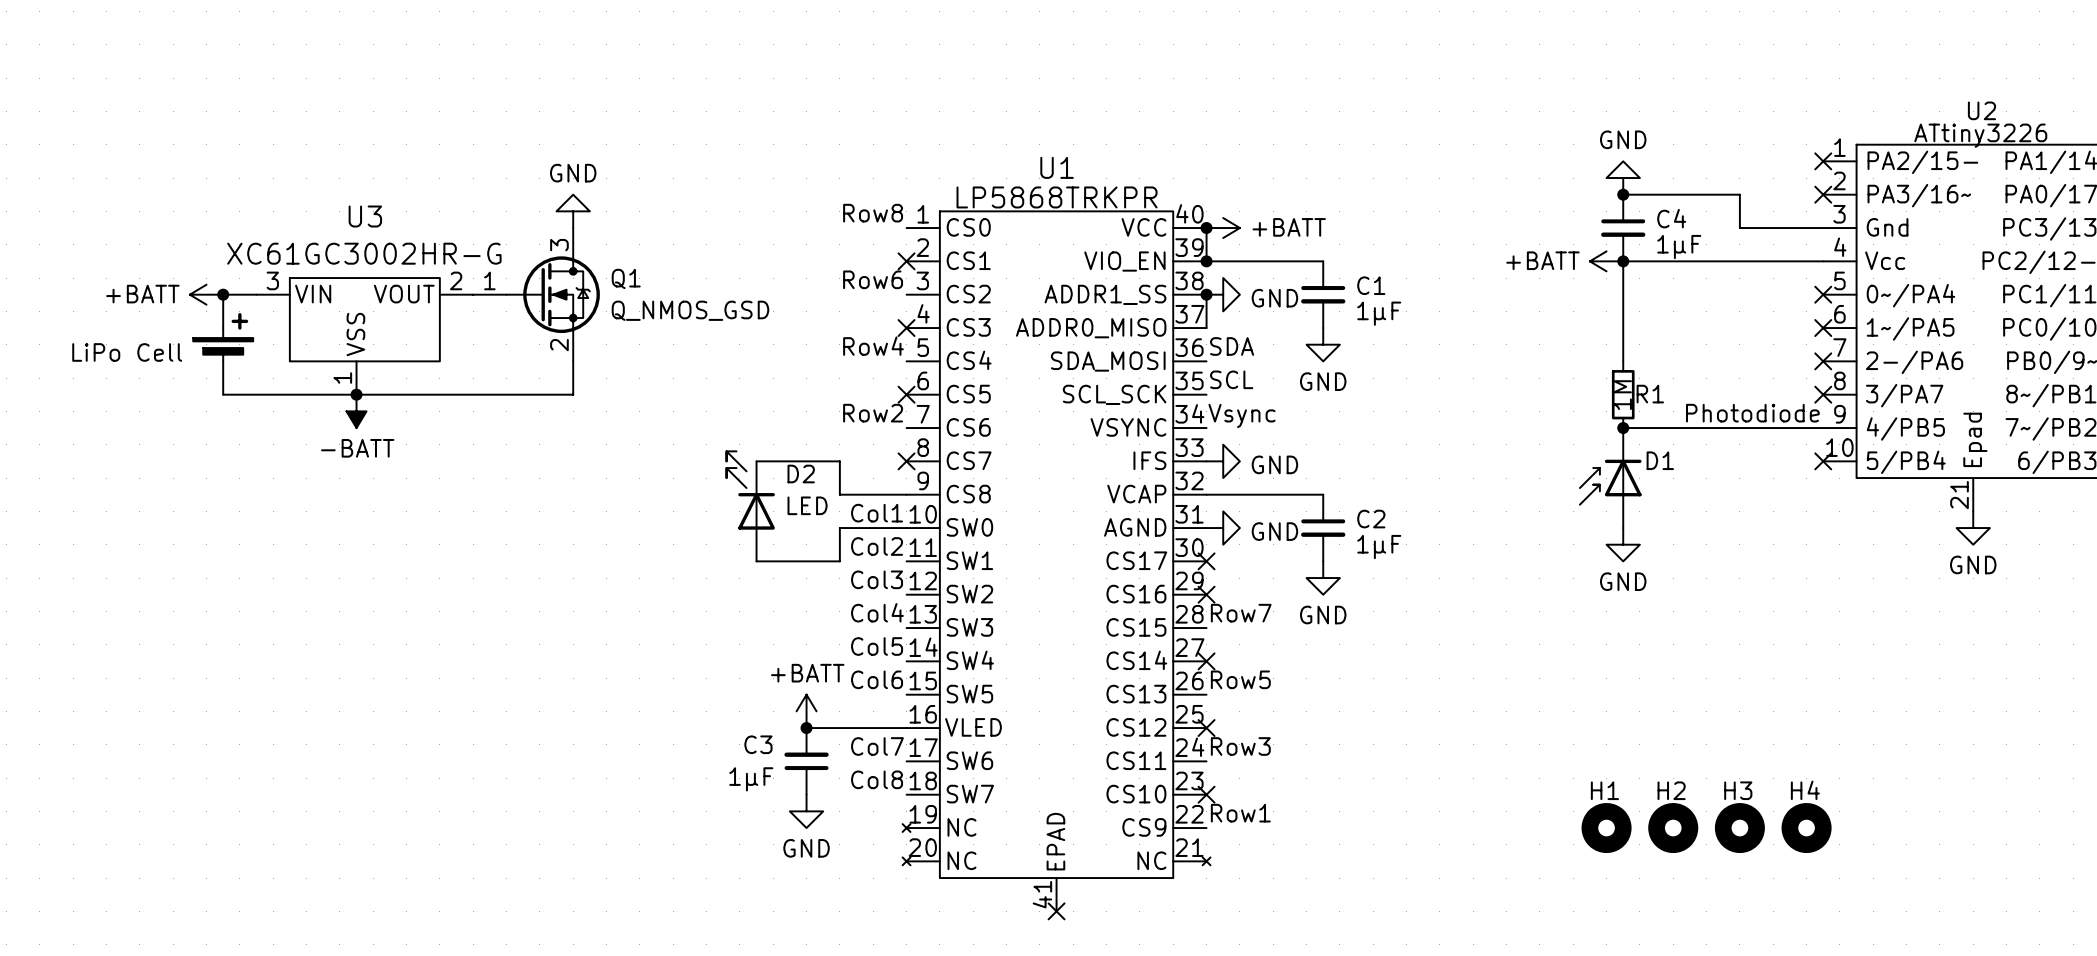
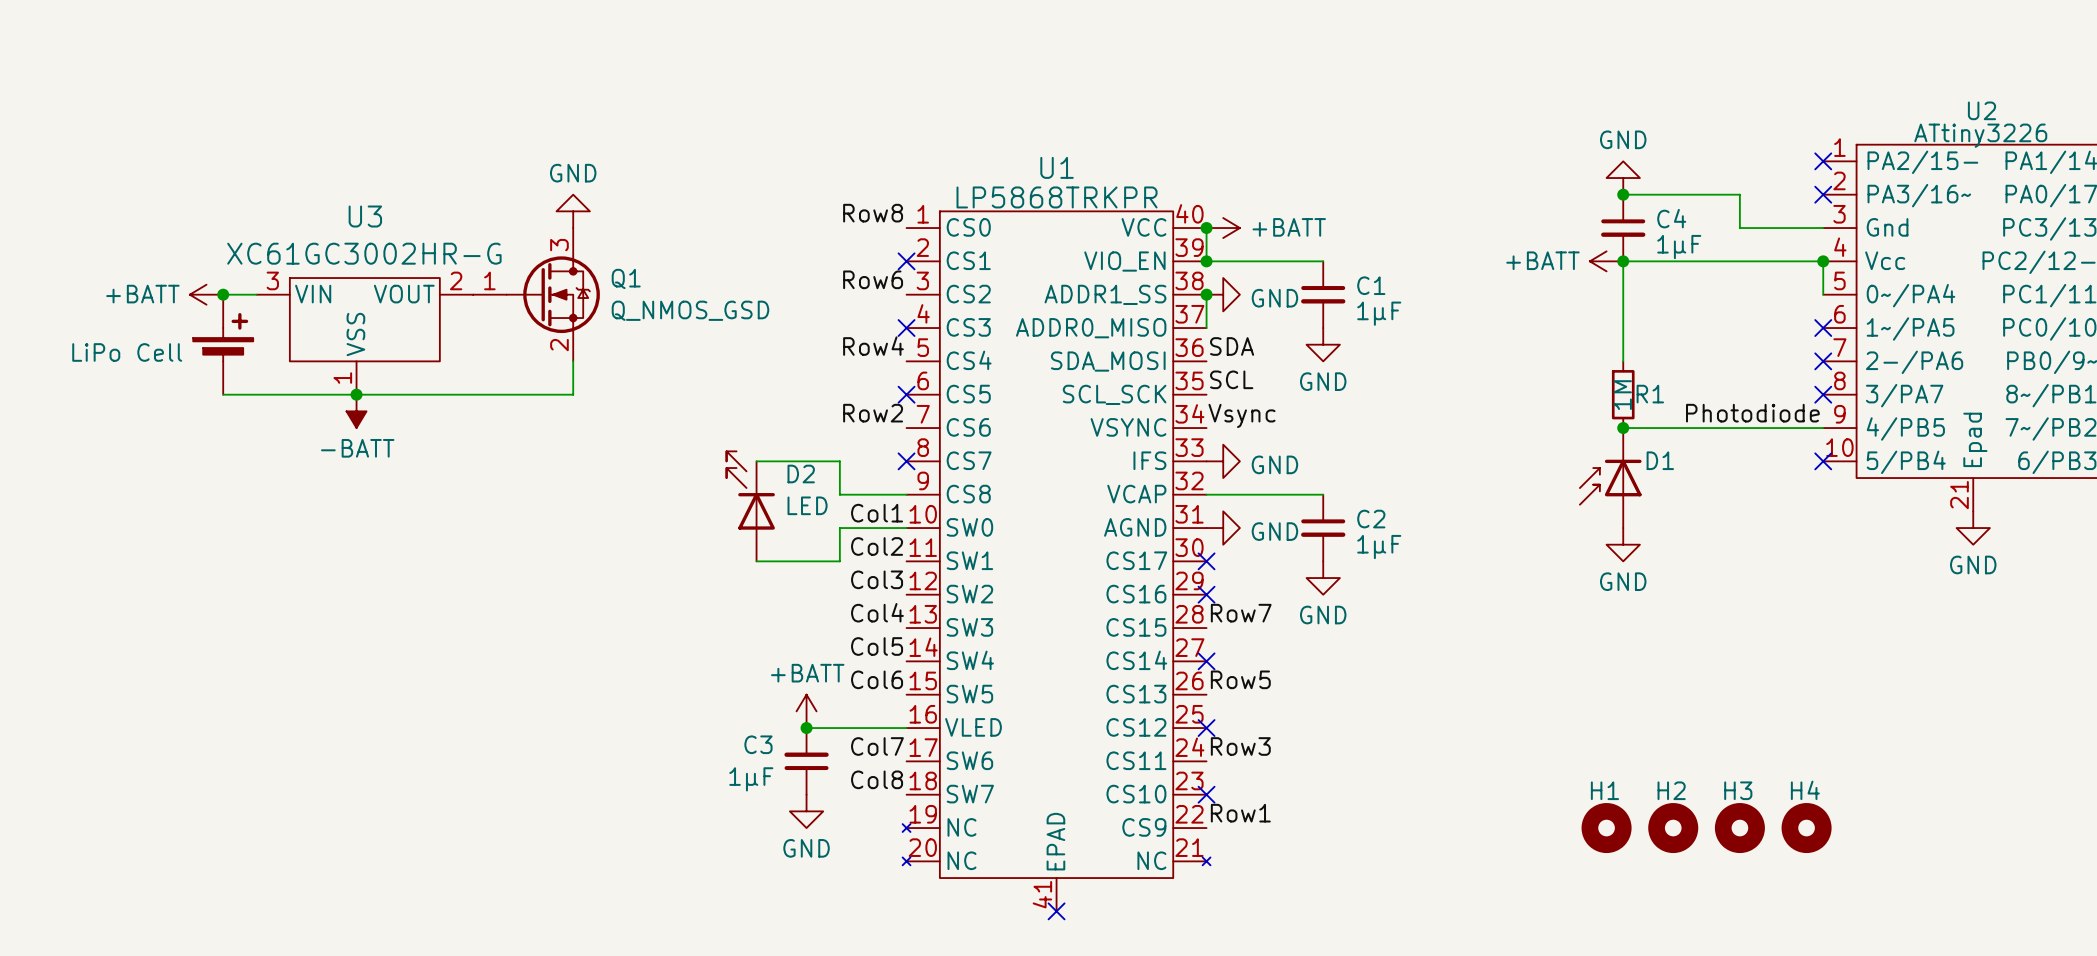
wire: none -> (1823, 261) (1823, 294)
junction: none -> (1823, 261)
no-connect mark: (1823, 294) -> none

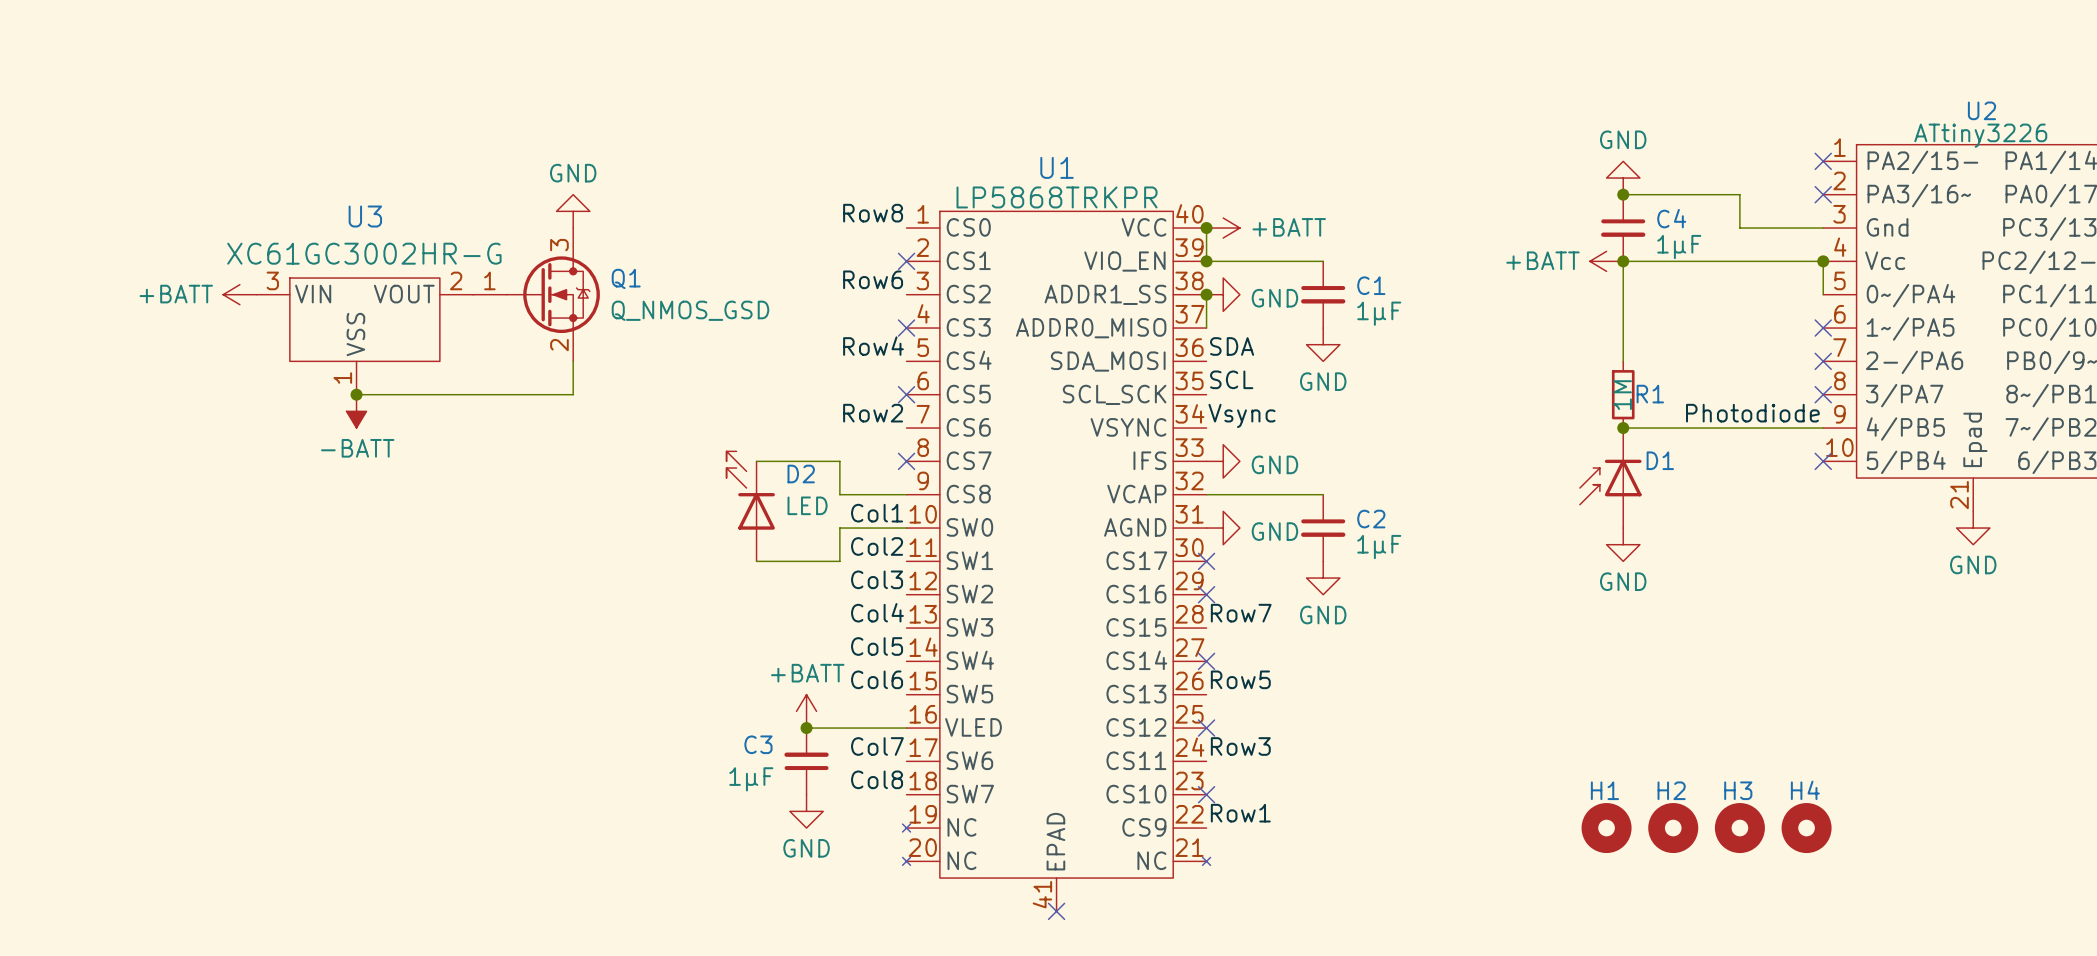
power symbol position: +BATT (206, 294) -> +BATT (239, 294)
junction: (223, 294) -> none
part: LiPo Cell (223, 344) -> none
wire: (223, 394) (356, 394) -> none

